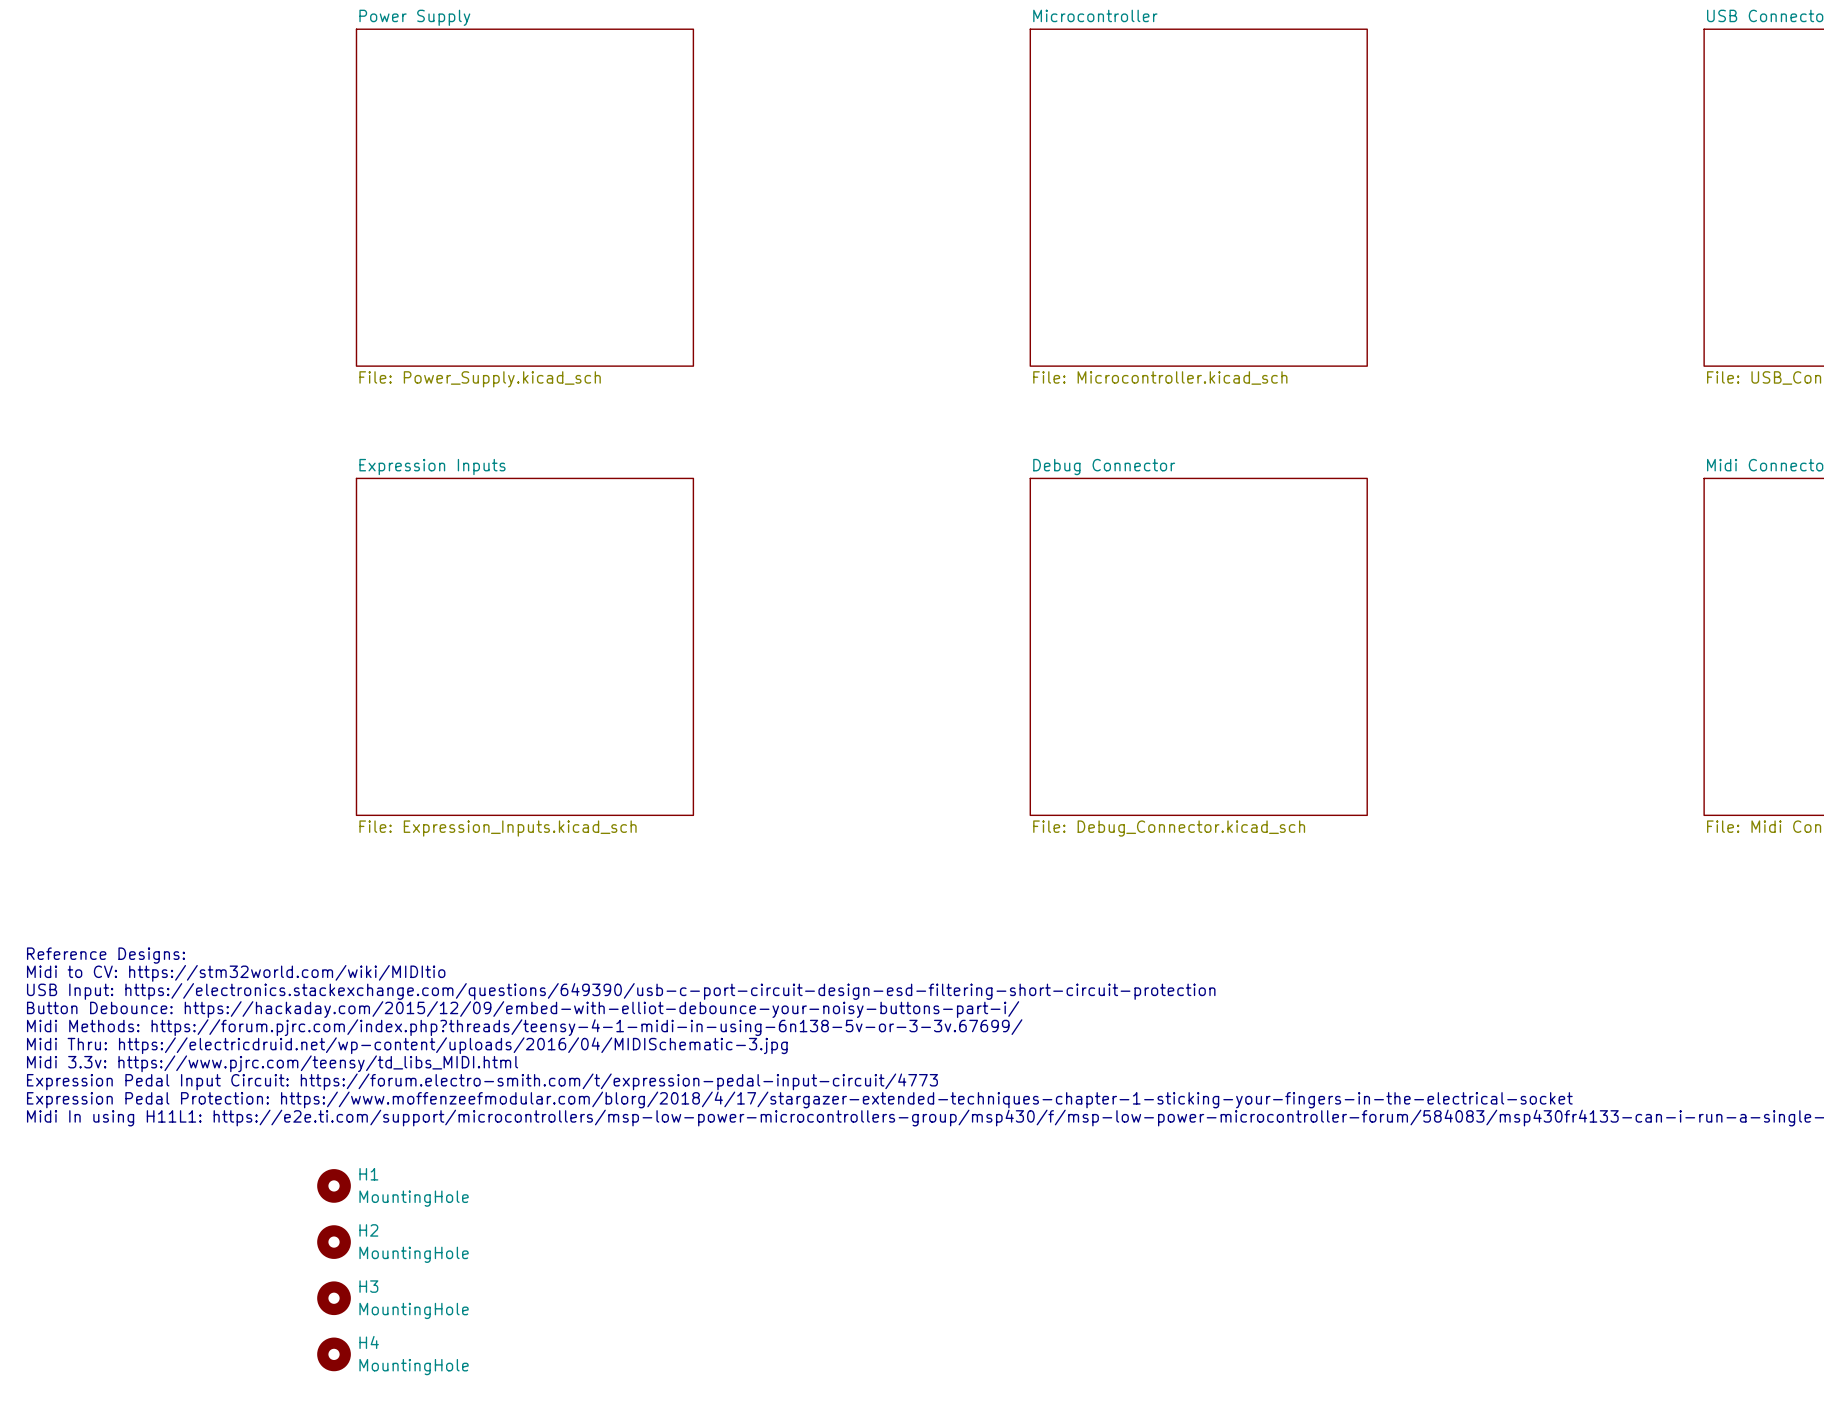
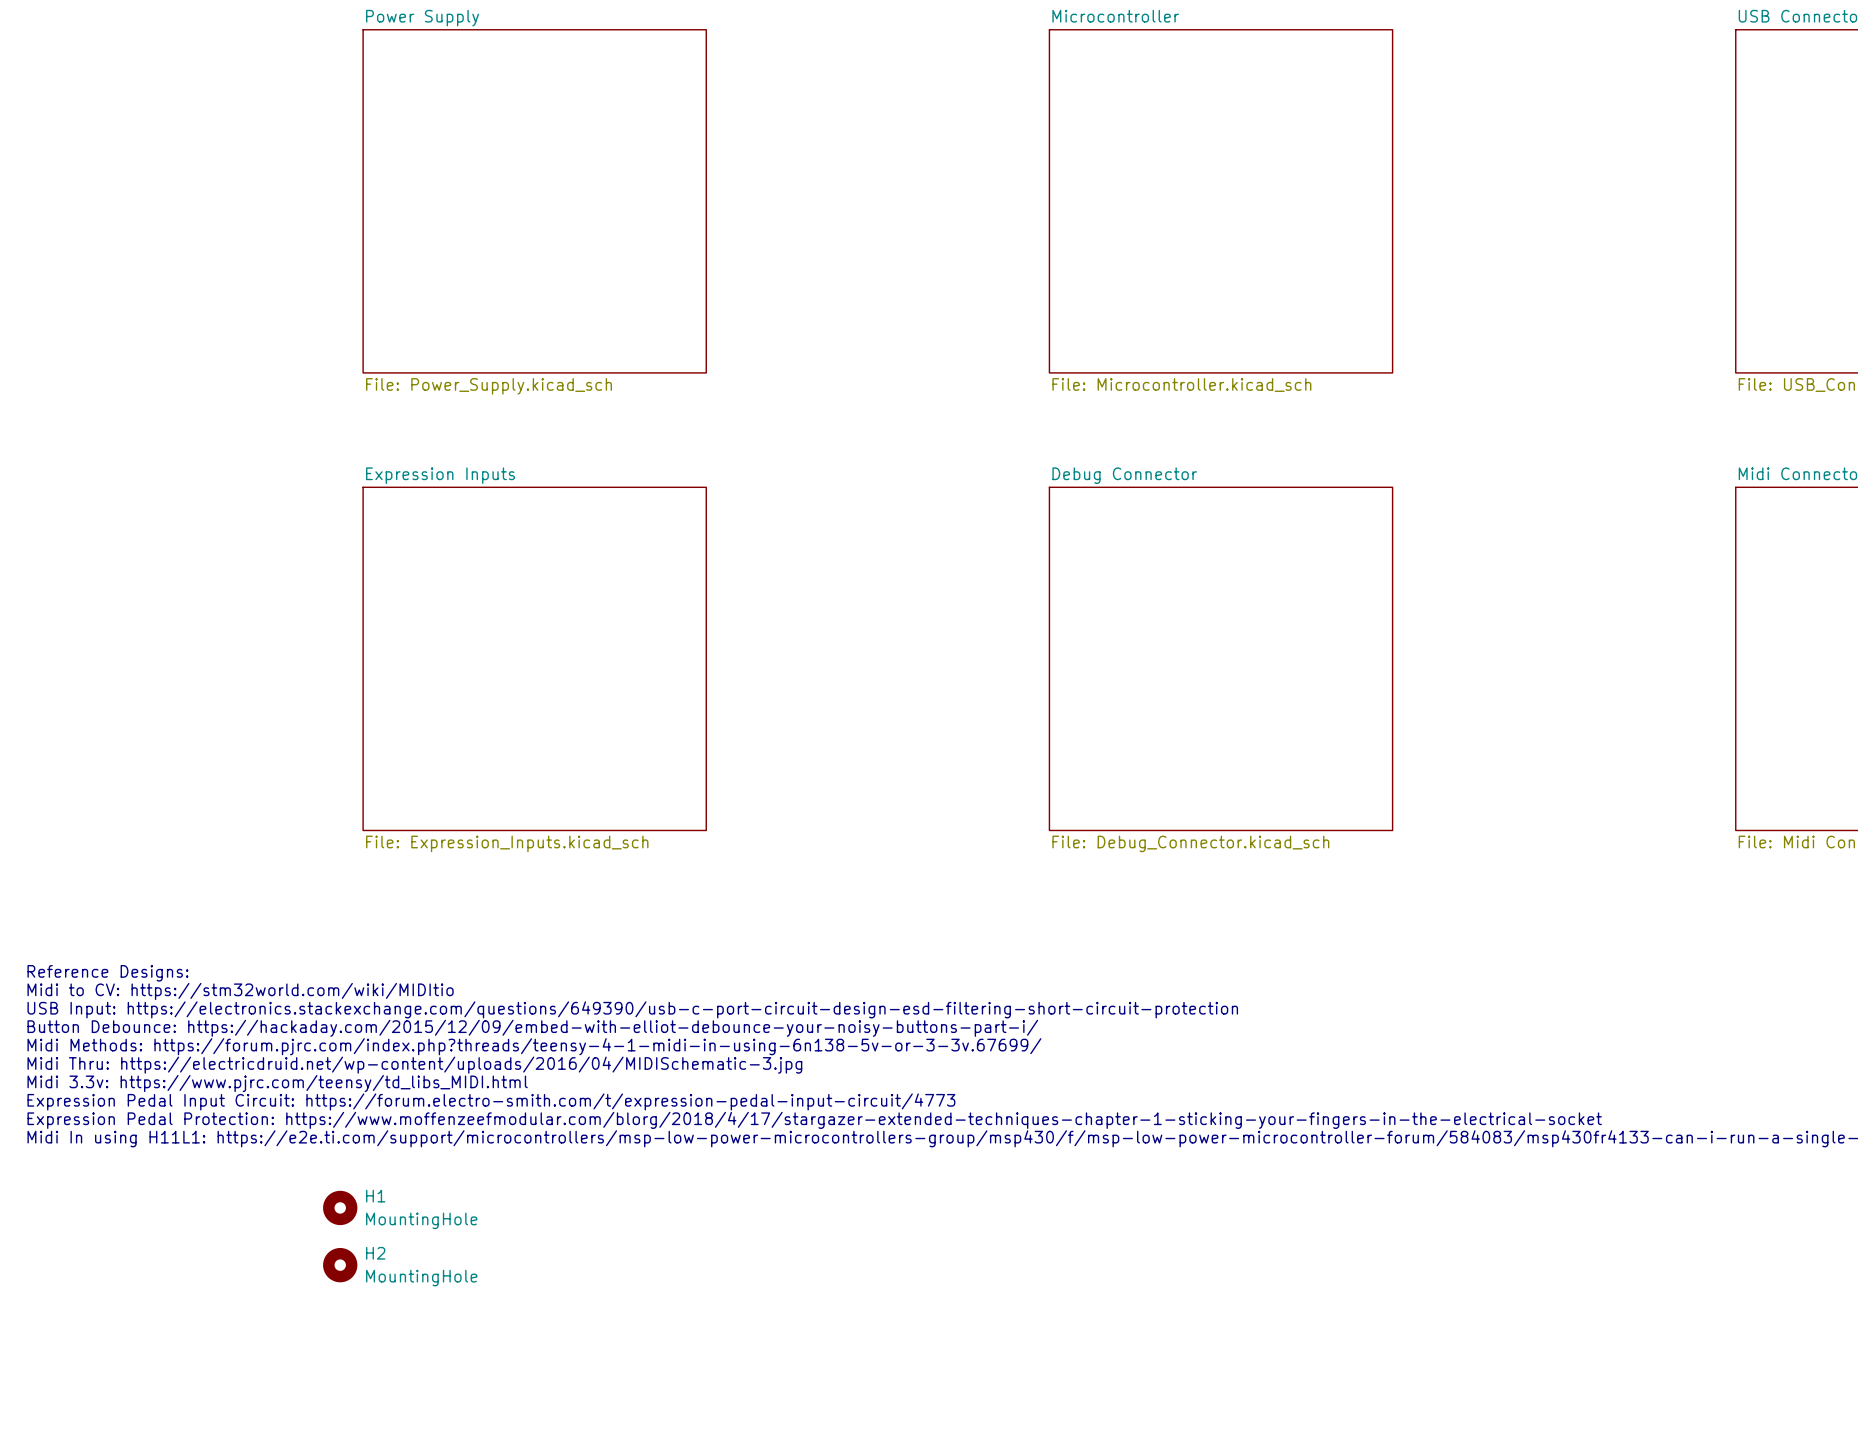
H3: MountingHole (334, 1298) -> none
H4: MountingHole (334, 1354) -> none

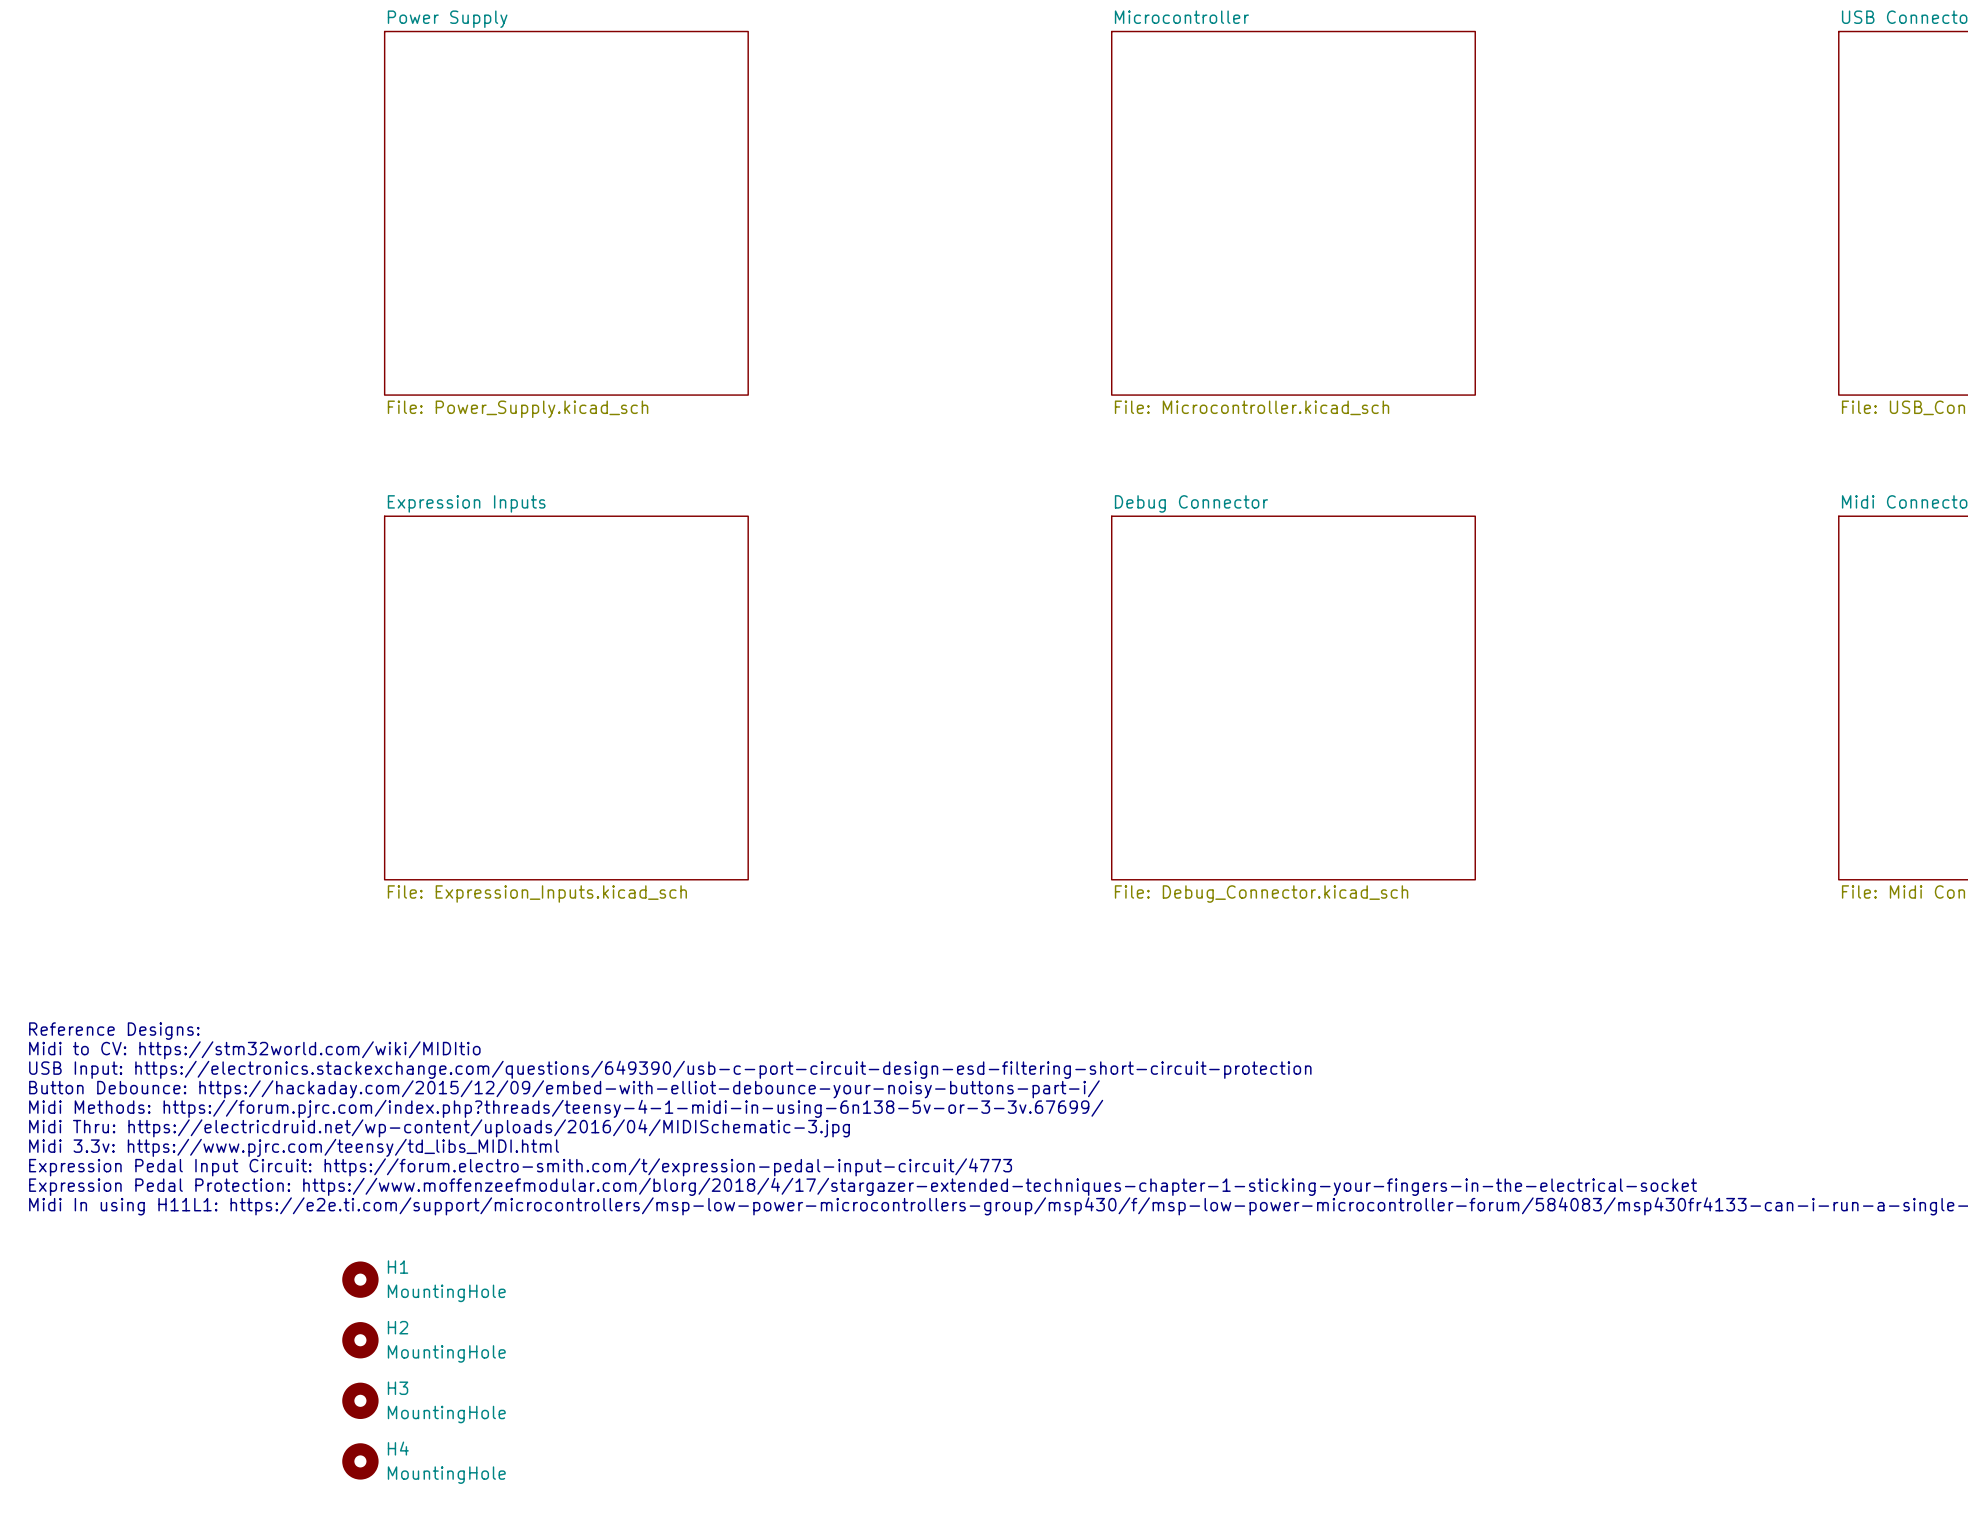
H3: none -> MountingHole (360, 1400)
H4: none -> MountingHole (360, 1461)

